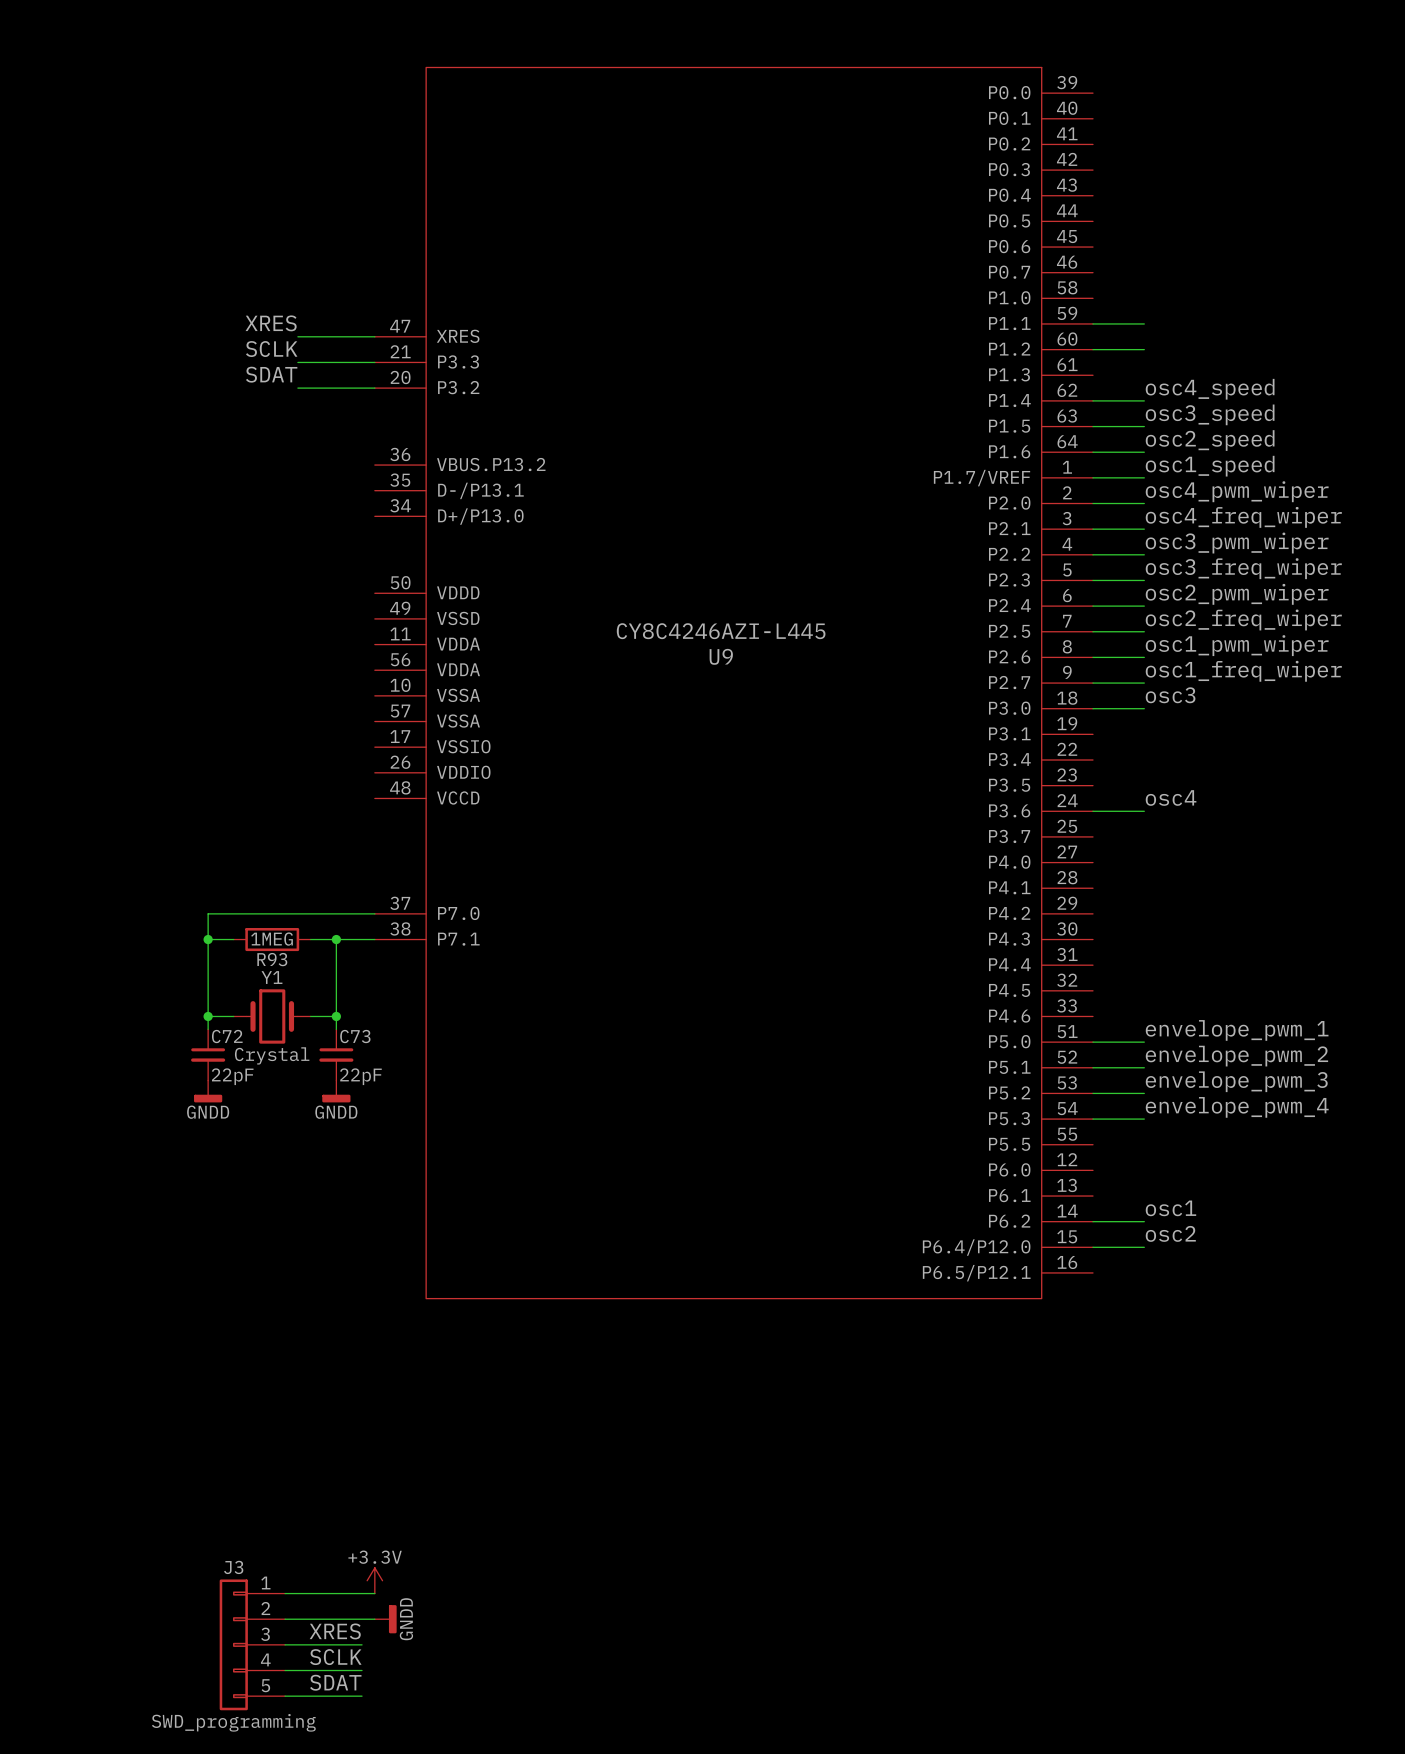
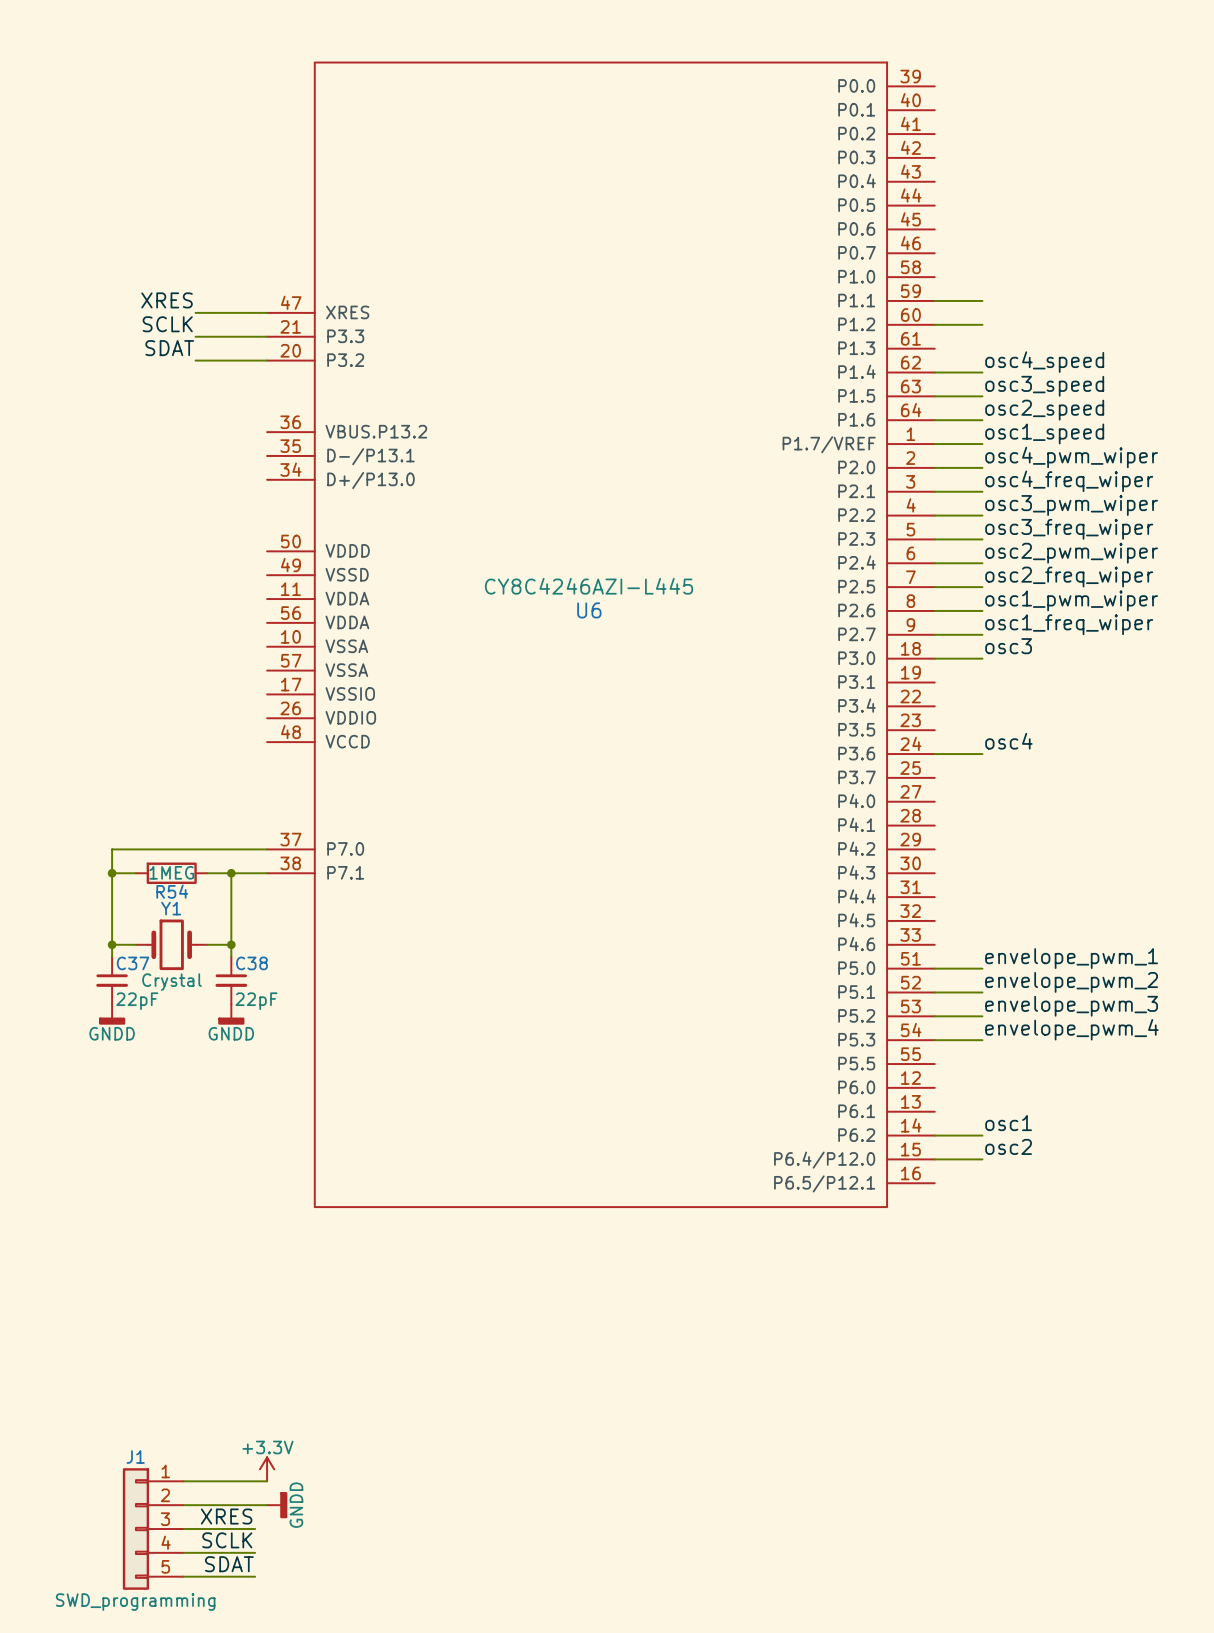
U9 name: U9 (721, 656) -> U6 (589, 610)
R93 name: R93 (272, 959) -> R54 (172, 891)
C72 name: C72 (227, 1036) -> C37 (133, 963)
C73 name: C73 (355, 1036) -> C38 (251, 963)
J3 name: J3 (233, 1567) -> J1 (135, 1457)

